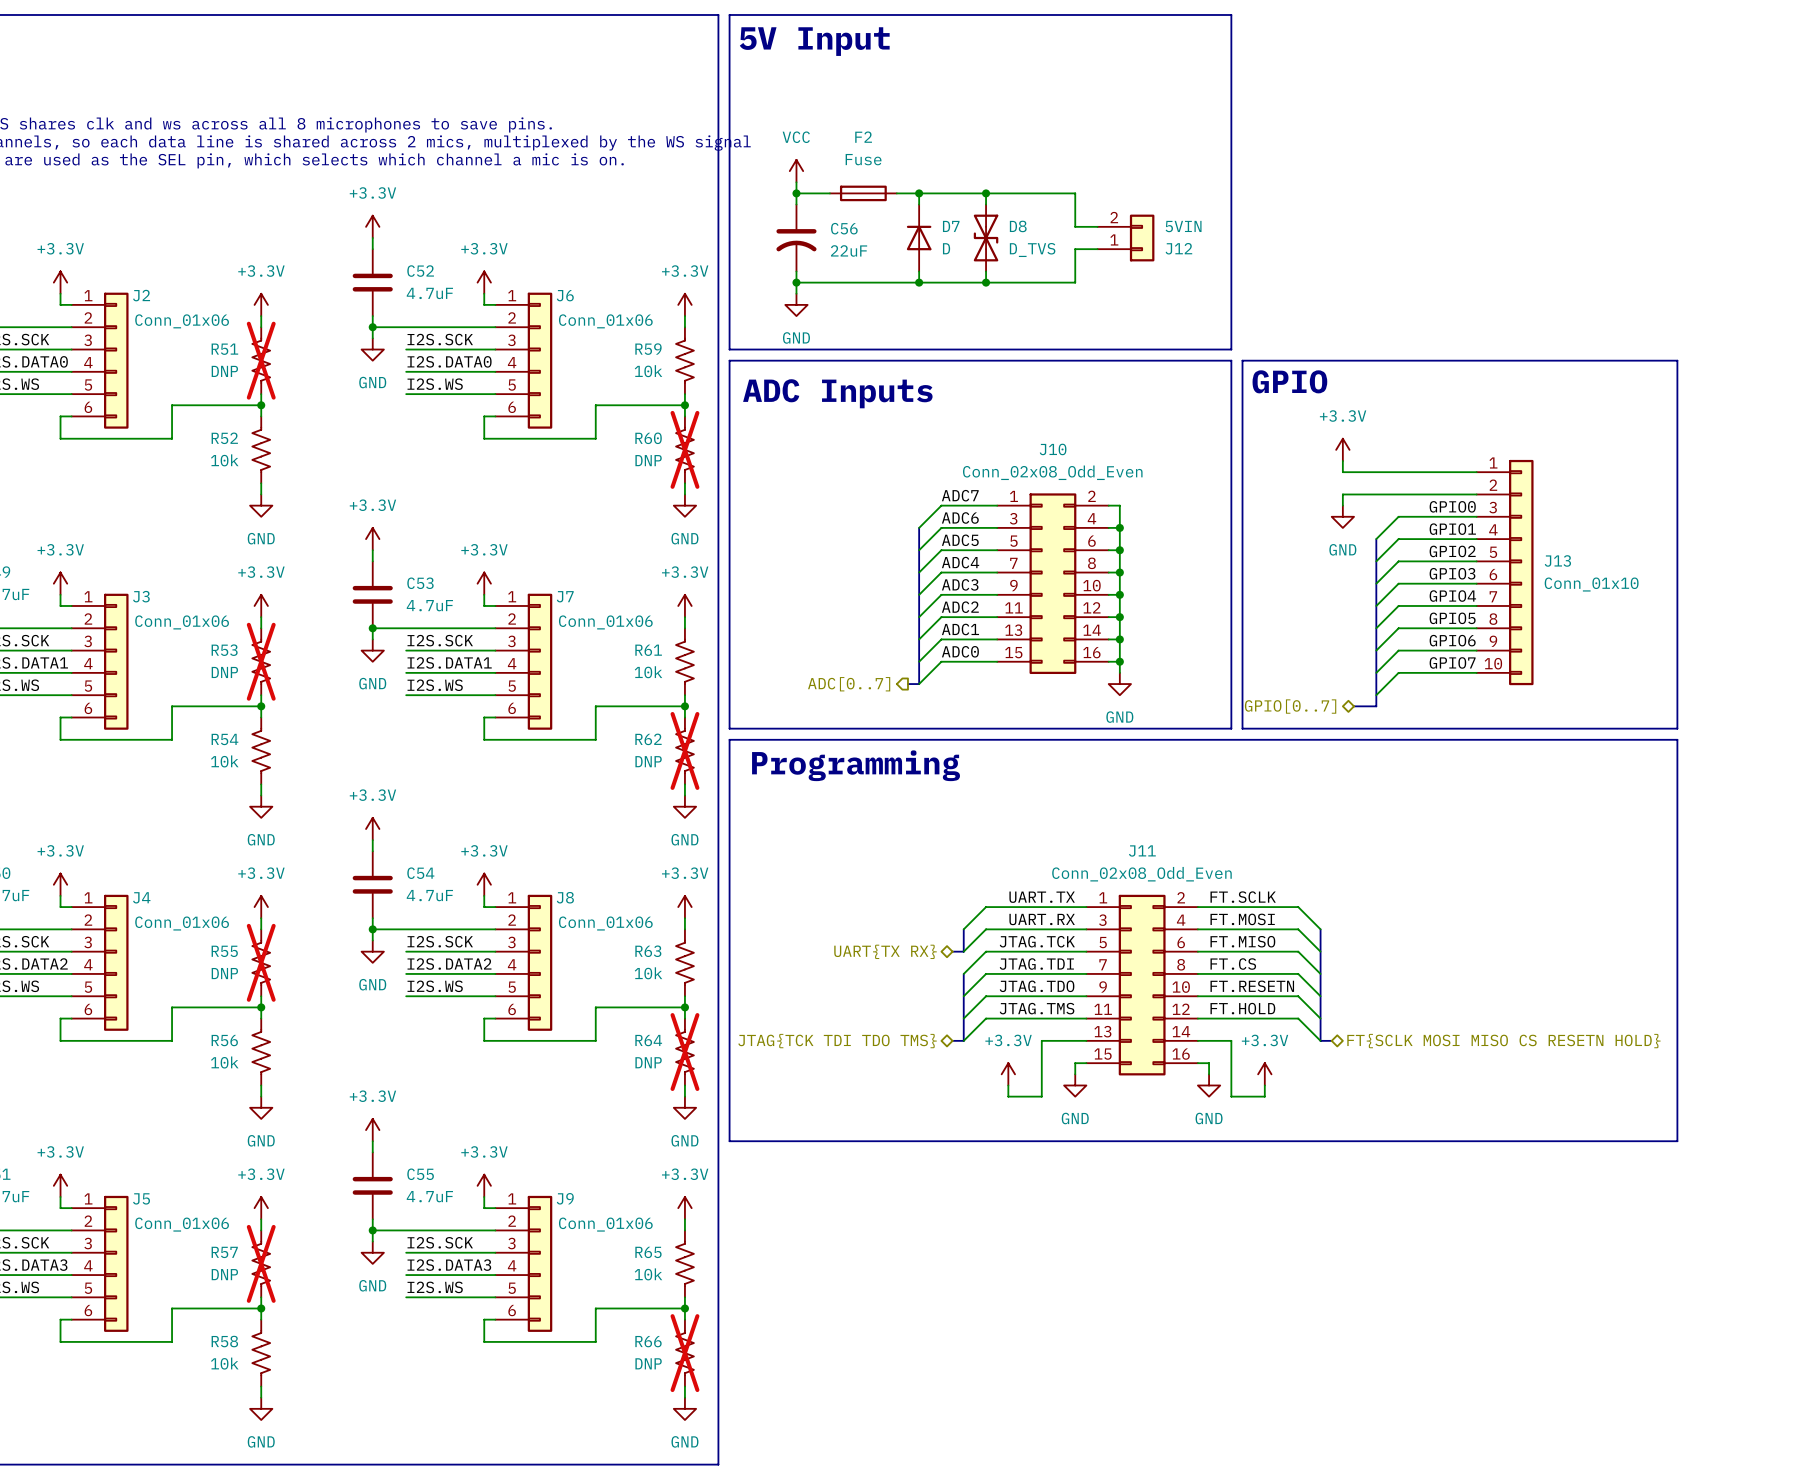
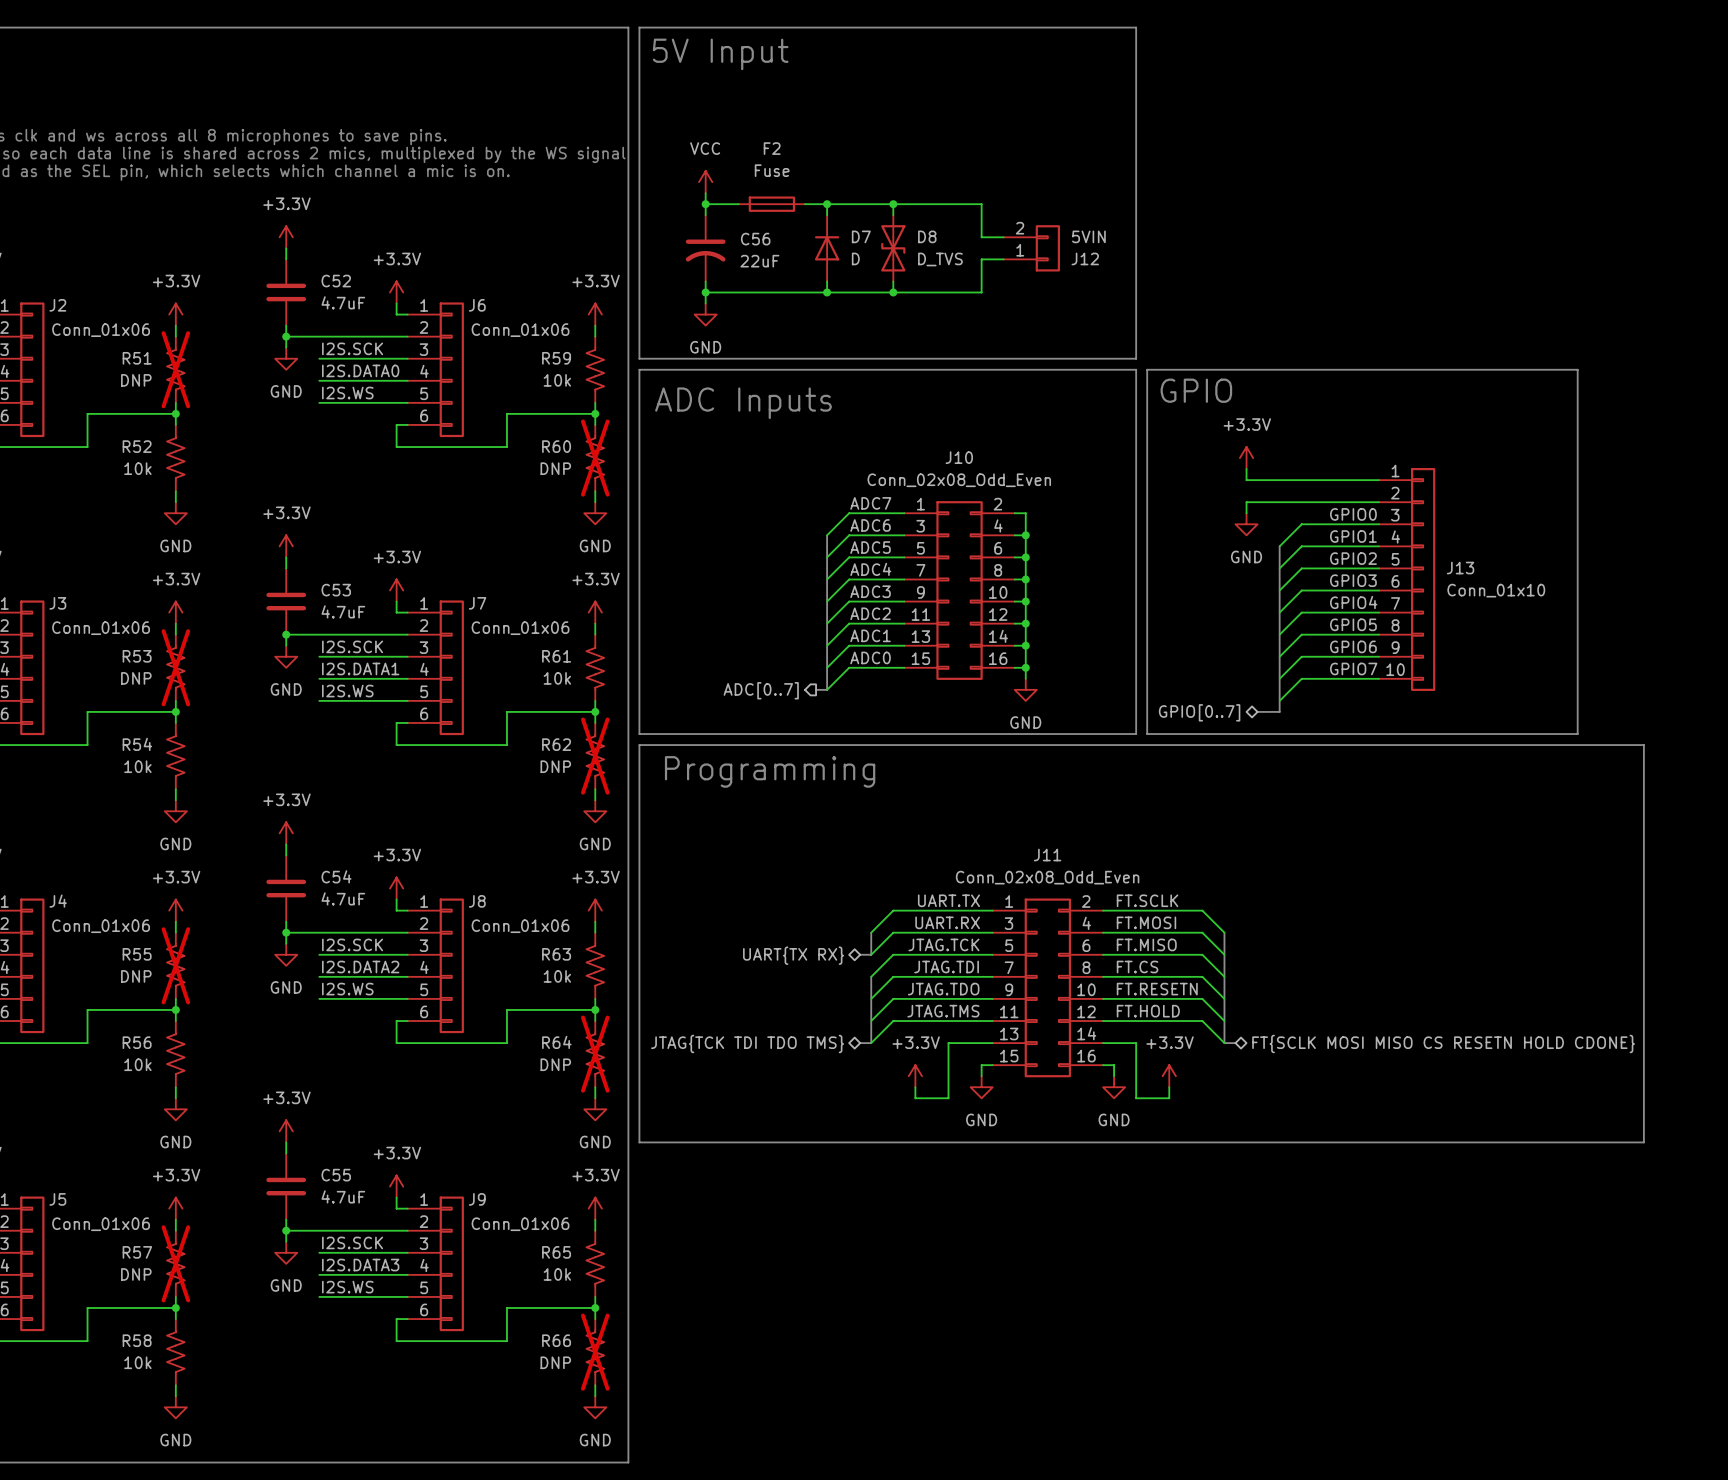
line: (1677, 739) (1677, 1141) -> (1577, 745) (1643, 745) (1643, 1142) (1577, 1142)
hierarchical label: FT{SCLK MOSI MISO CS RESETN HOLD} (1503, 1041) -> FT{SCLK MOSI MISO CS RESETN HOLD CDONE} (1443, 1043)

